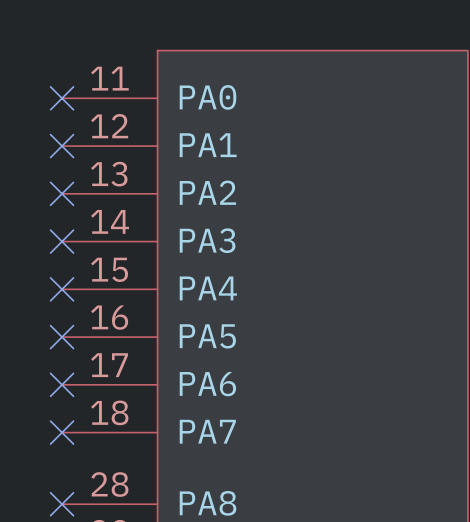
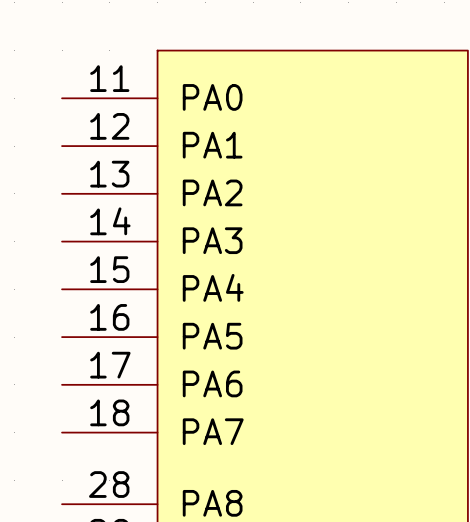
no-connect mark: (62, 98) -> none
no-connect mark: (62, 146) -> none
no-connect mark: (62, 193) -> none
no-connect mark: (62, 241) -> none
no-connect mark: (62, 289) -> none
no-connect mark: (62, 337) -> none
no-connect mark: (62, 384) -> none
no-connect mark: (62, 432) -> none
no-connect mark: (62, 504) -> none

